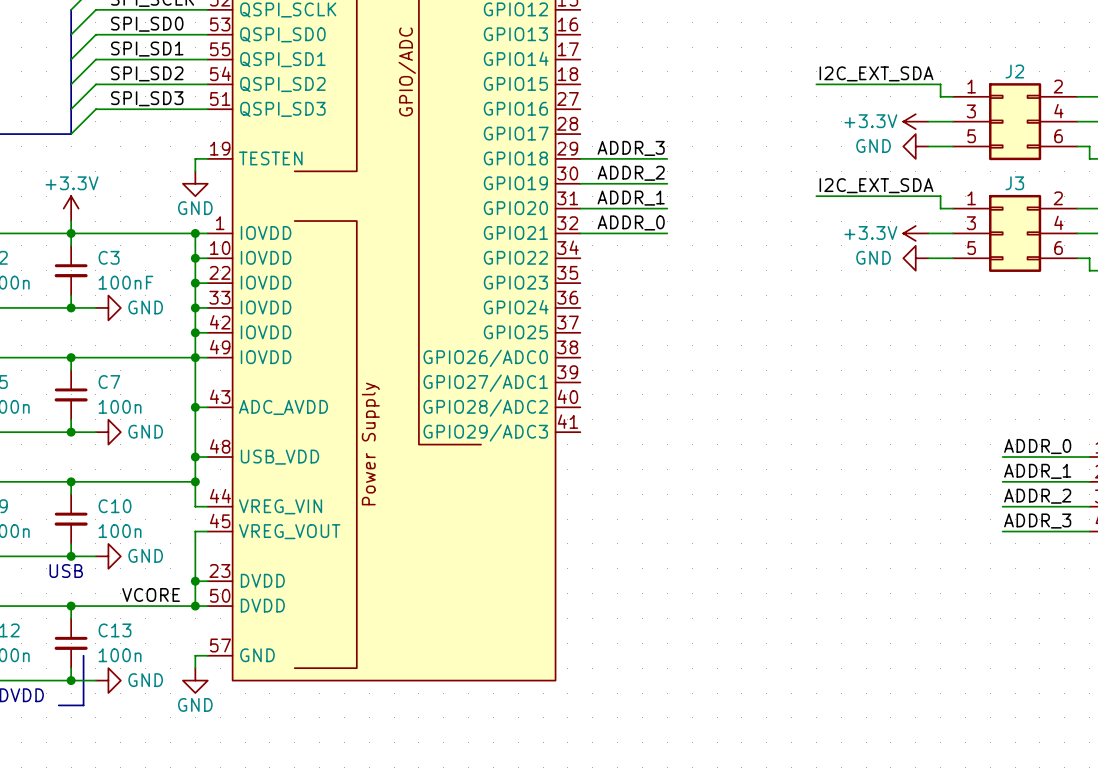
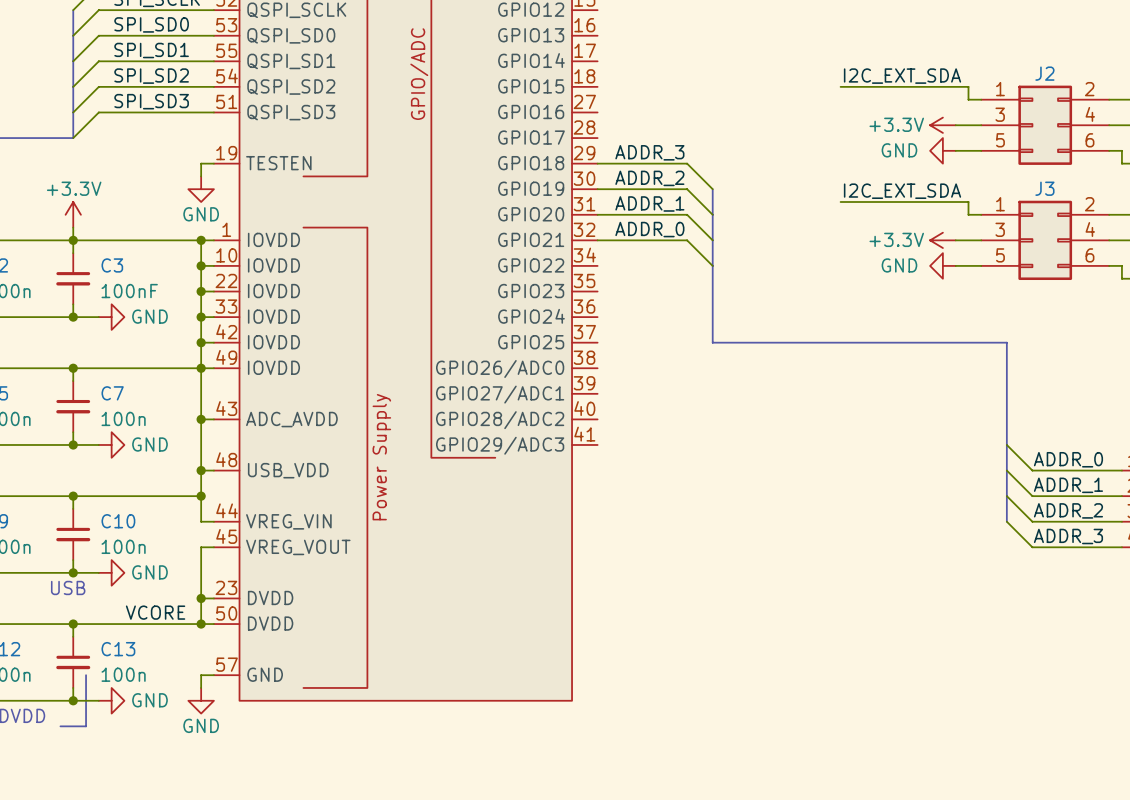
wire: none -> (687, 163) (712, 189)
wire: none -> (687, 189) (712, 214)
bus: none -> (712, 189) (712, 342) (1006, 342) (1006, 521)
wire: none -> (687, 214) (712, 240)
wire: none -> (687, 240) (712, 265)
wire: none -> (1006, 444) (1032, 470)
wire: none -> (1006, 470) (1032, 496)
wire: none -> (1006, 496) (1032, 521)
wire: none -> (1006, 521) (1032, 547)

